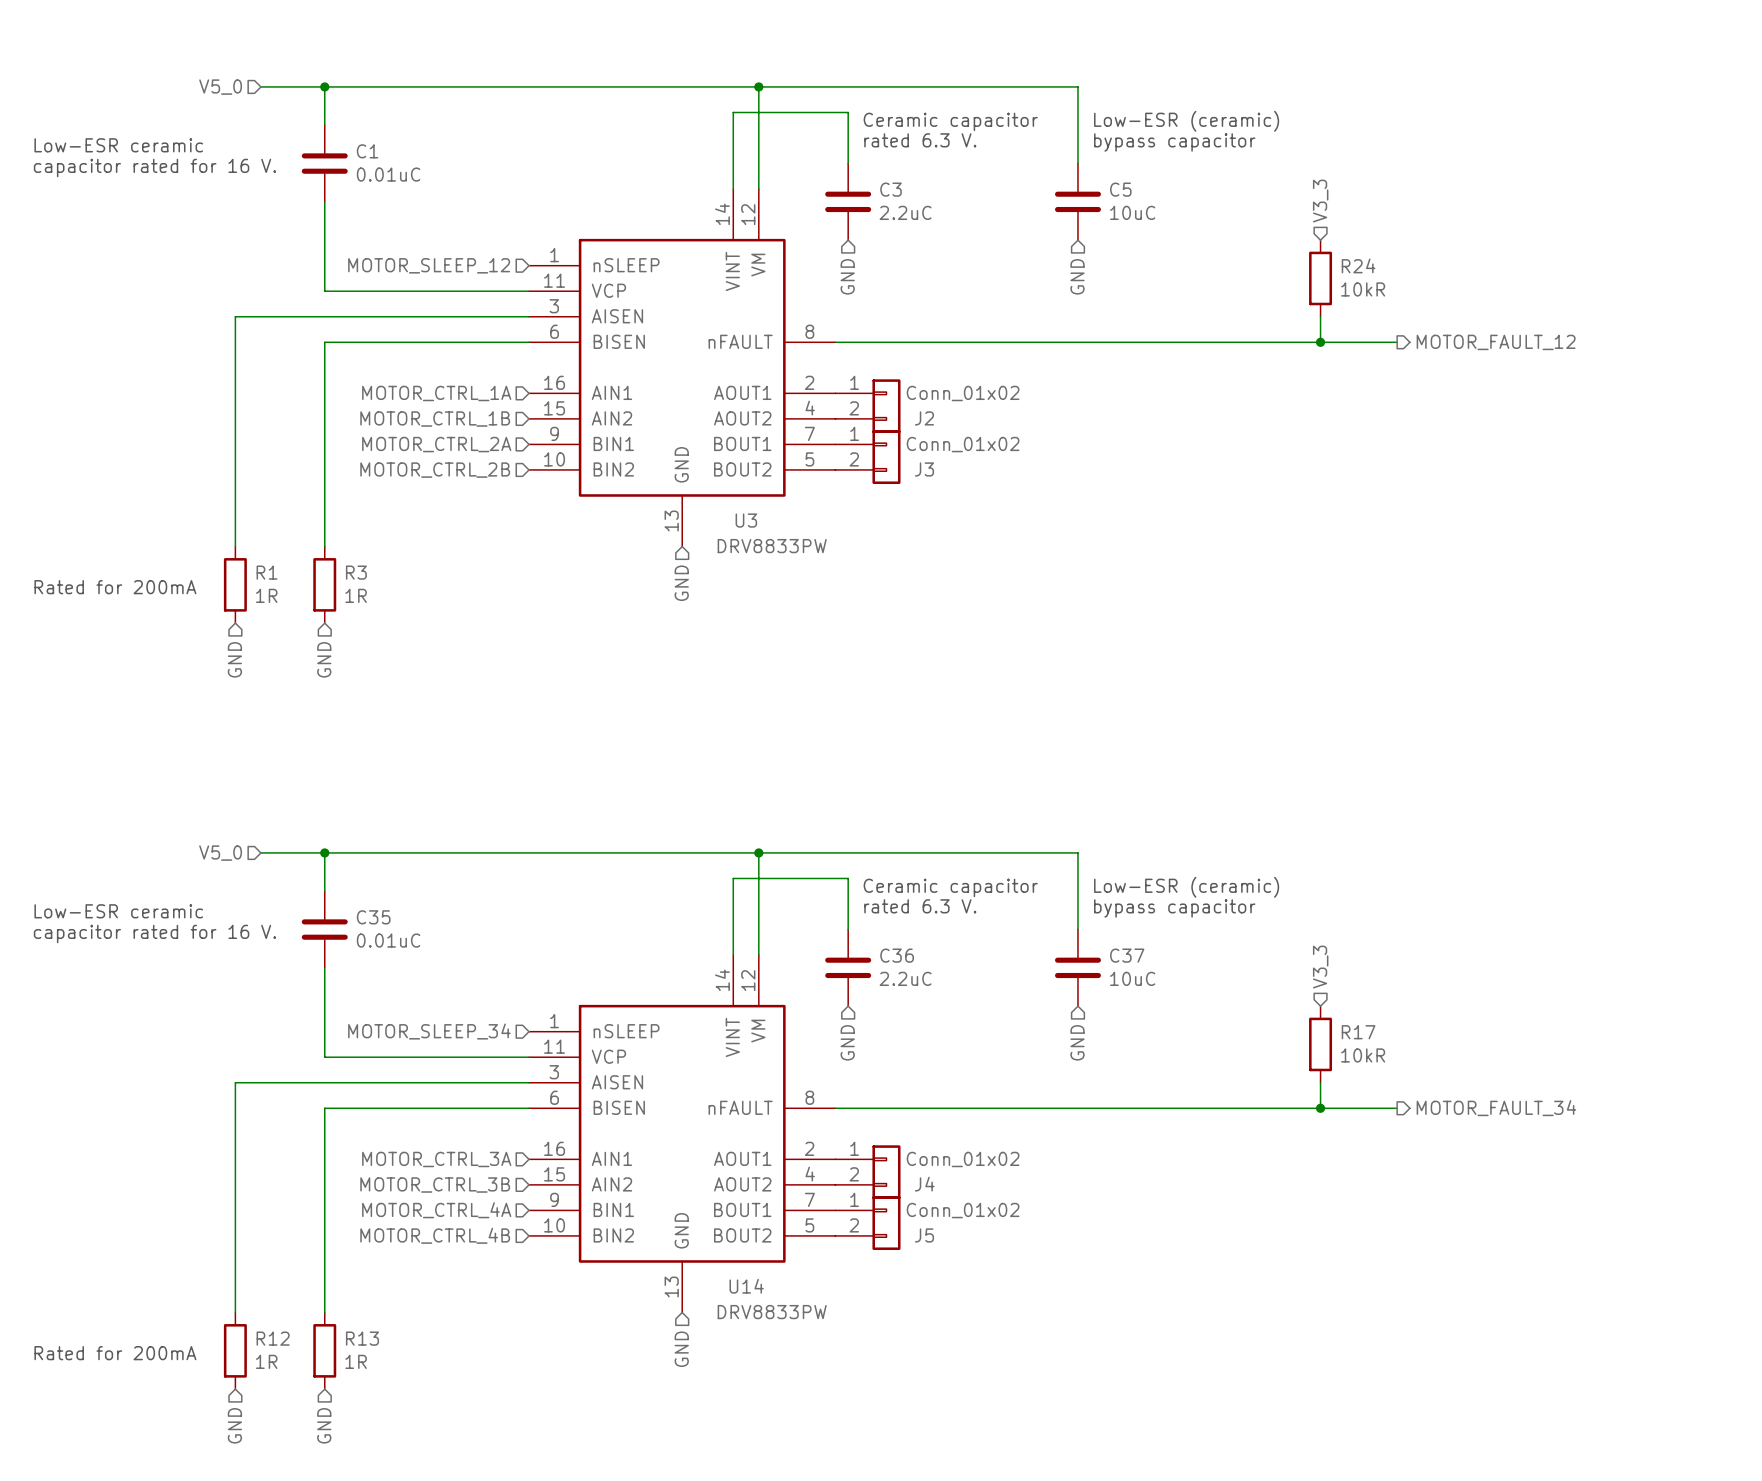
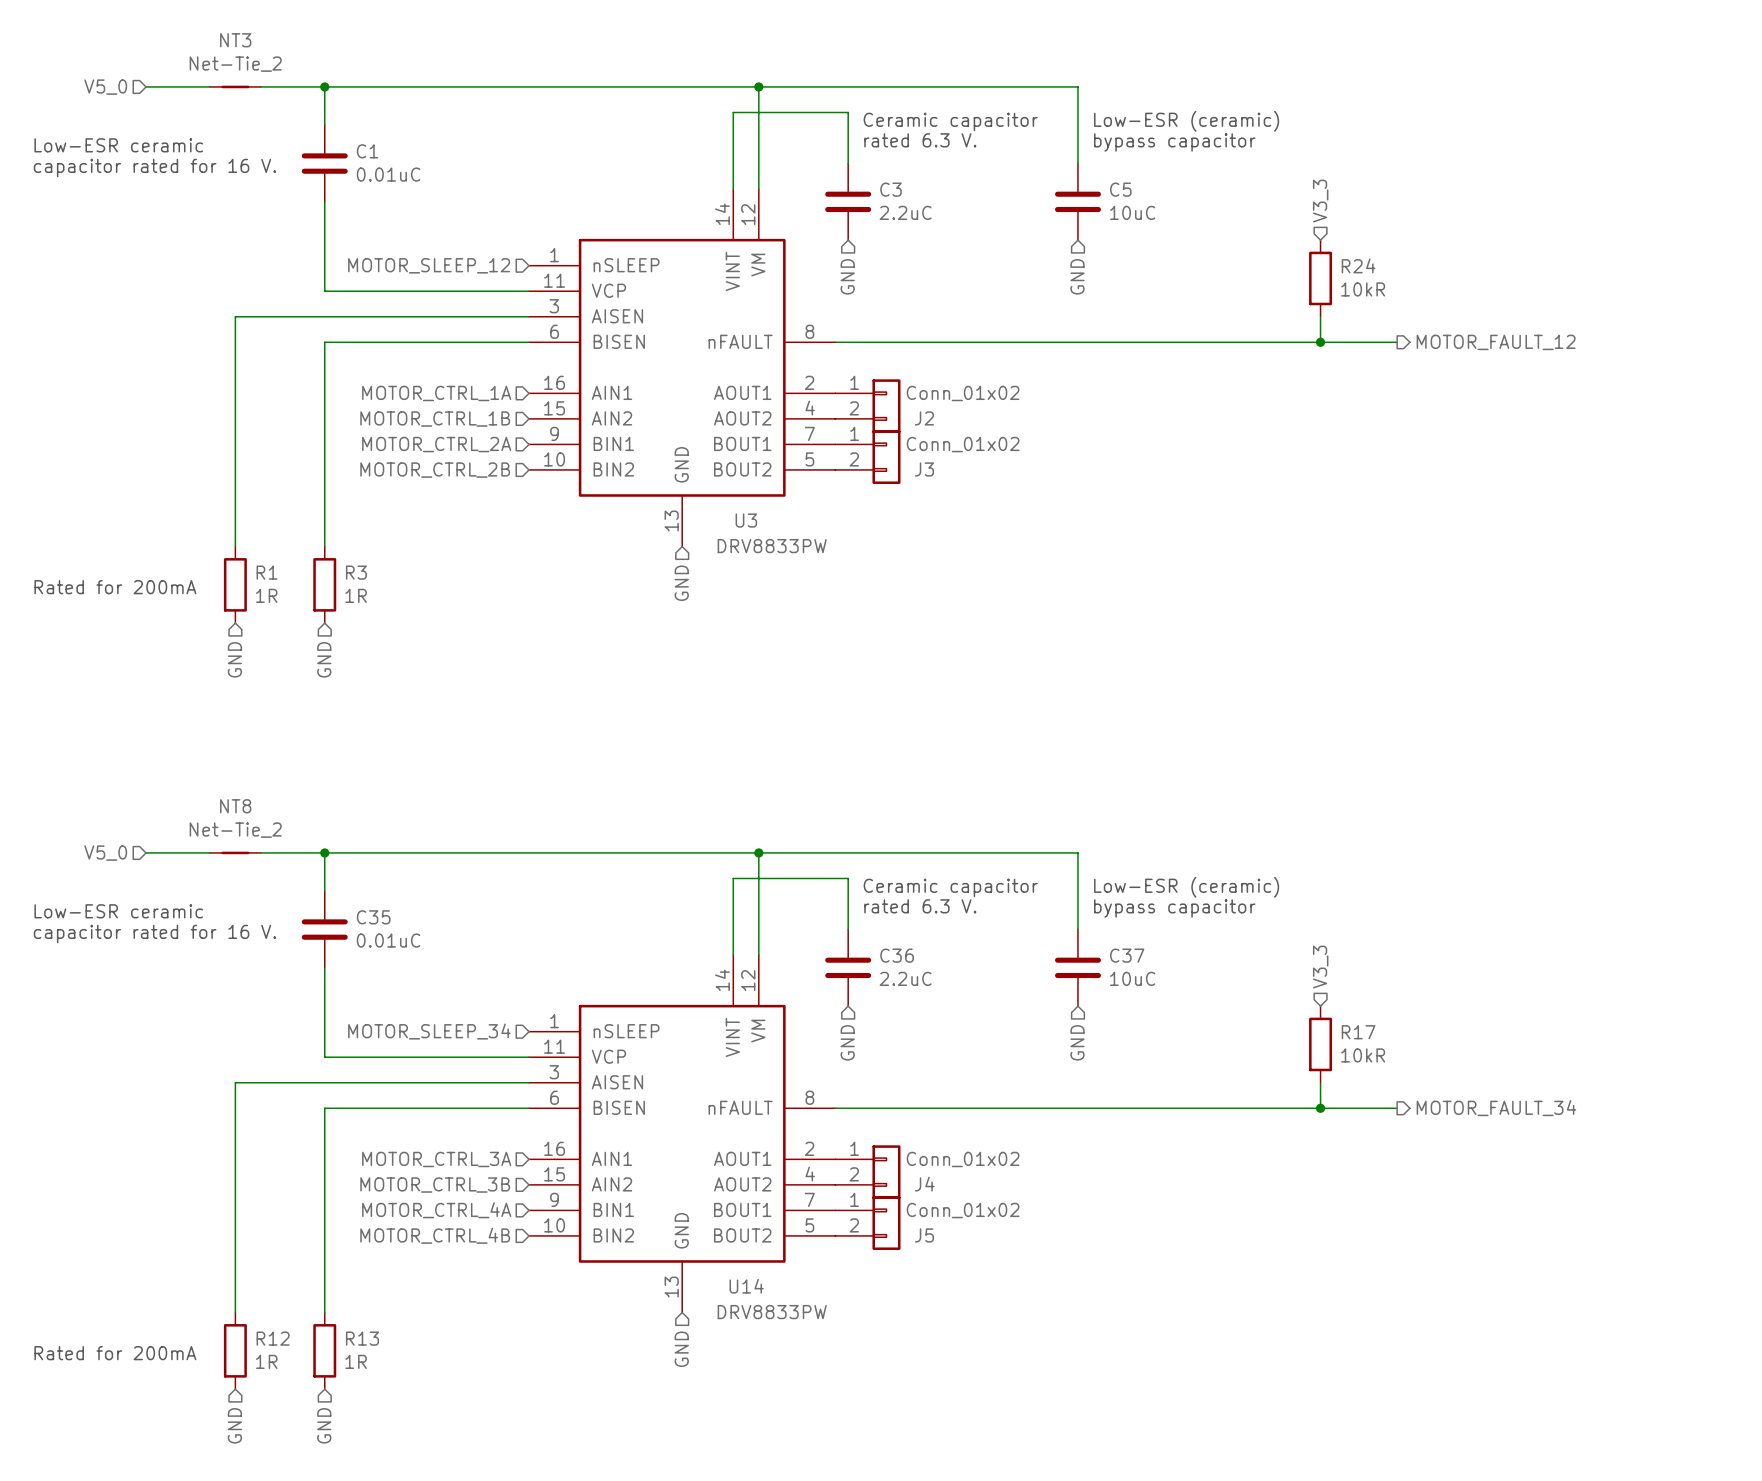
wire: none -> (146, 86) (209, 86)
NT3: none -> Net-Tie_2 (235, 86)
hierarchical label position: V5_0 (220, 87) -> V5_0 (105, 87)
wire: none -> (146, 852) (209, 852)
NT8: none -> Net-Tie_2 (235, 852)
hierarchical label position: V5_0 (220, 853) -> V5_0 (105, 853)

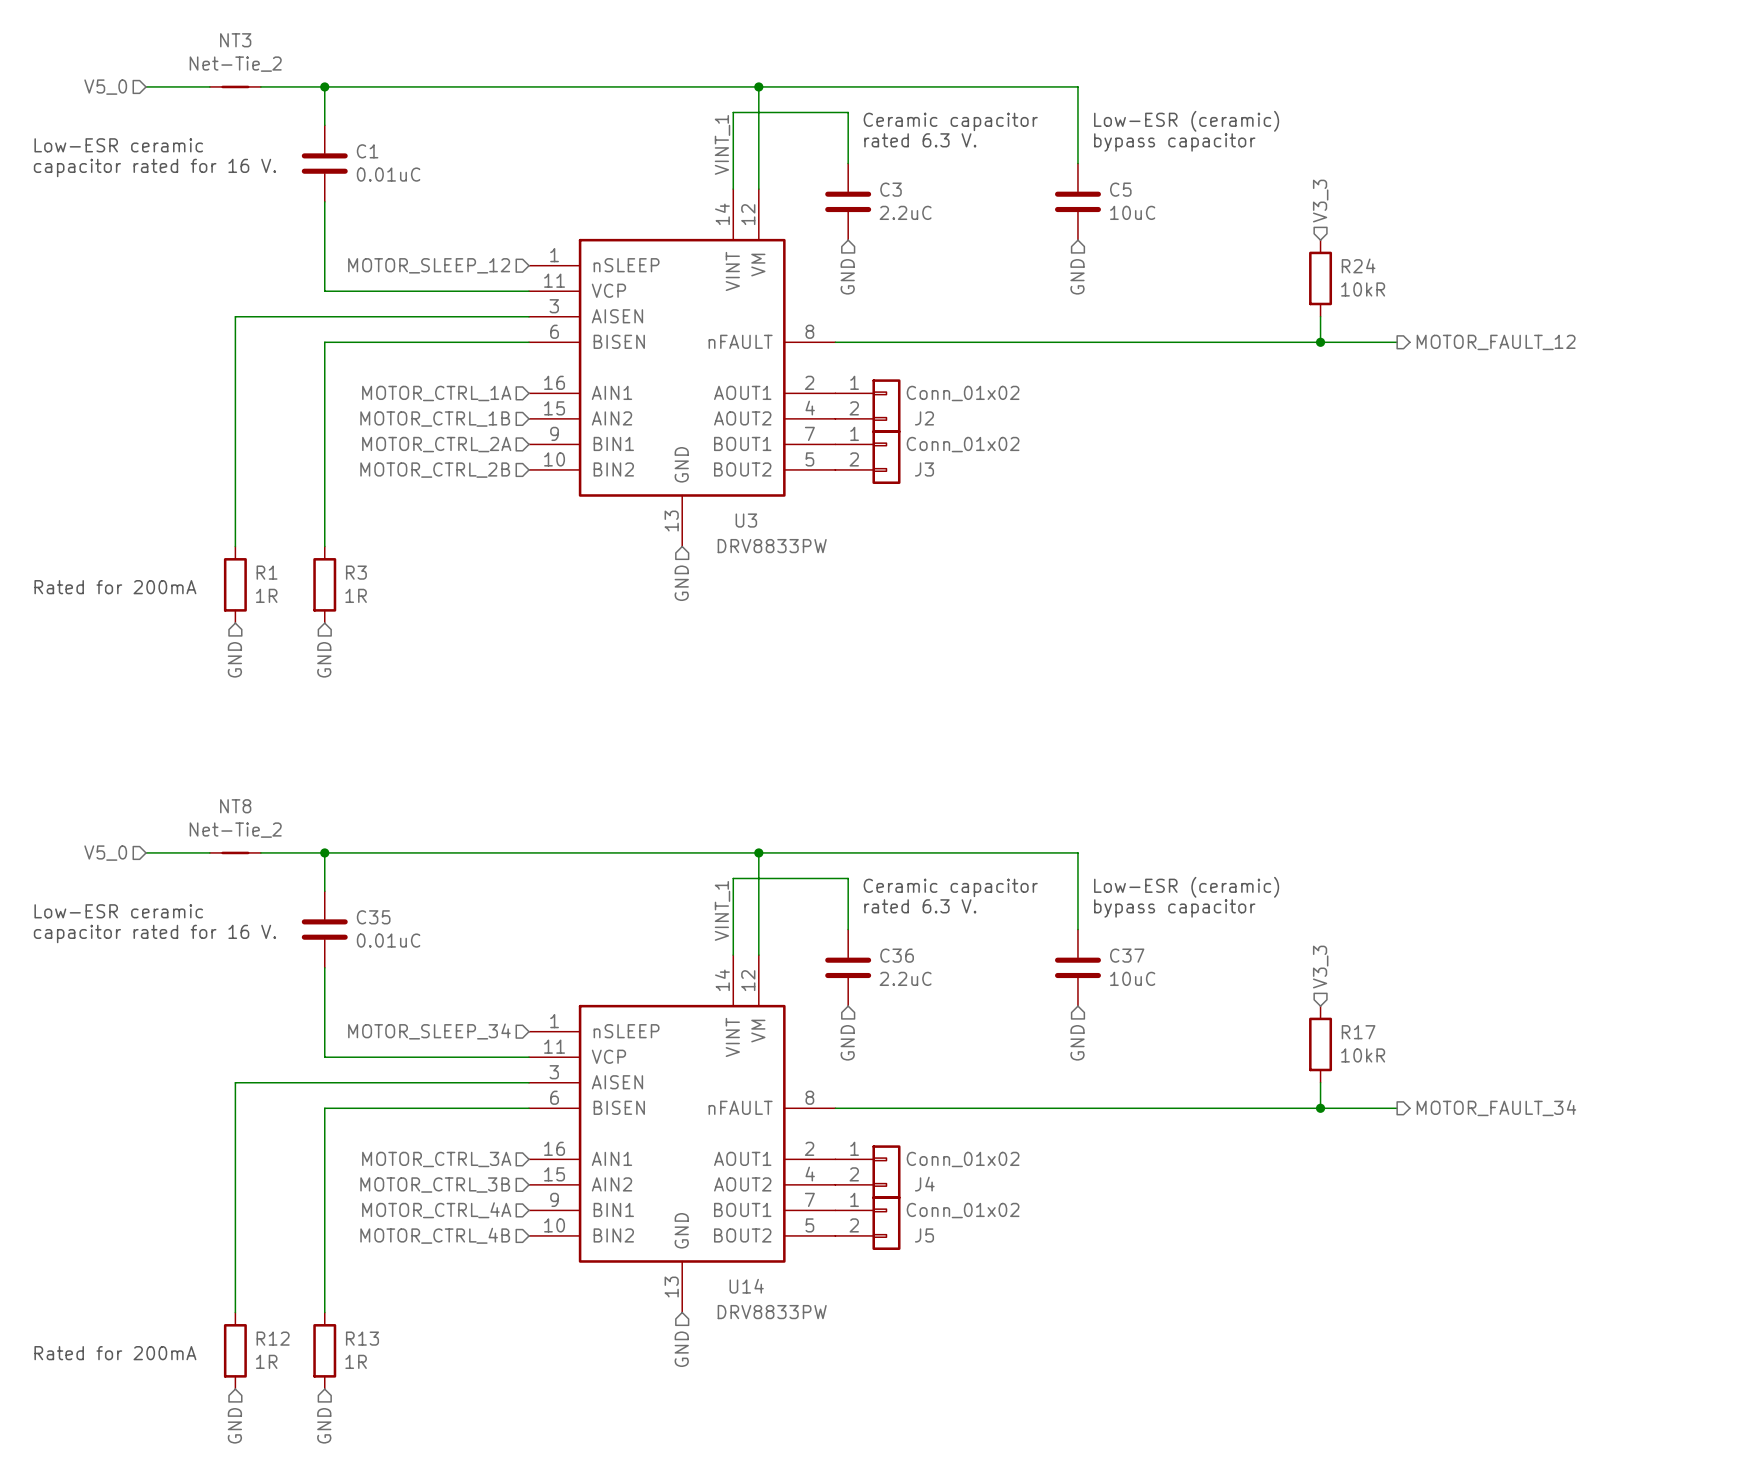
label: none -> VINT_1 (722, 144)
label: none -> VINT_1 (722, 910)

